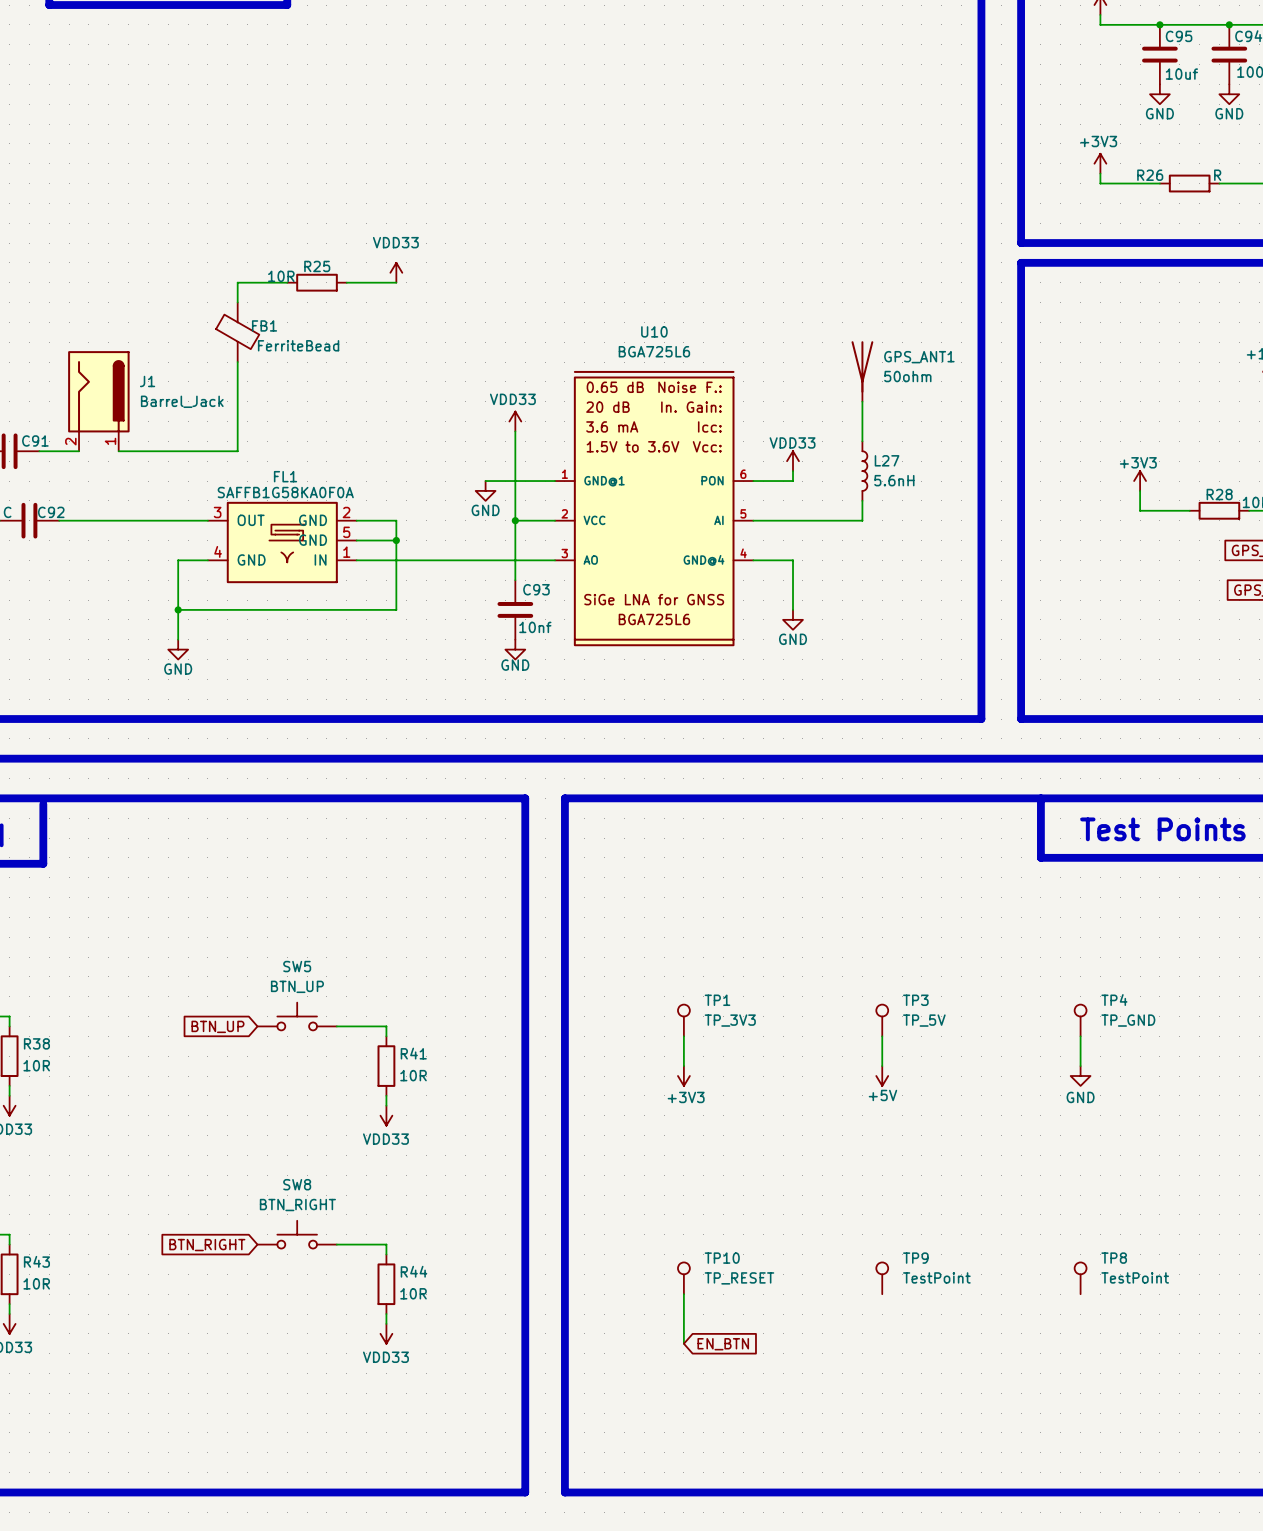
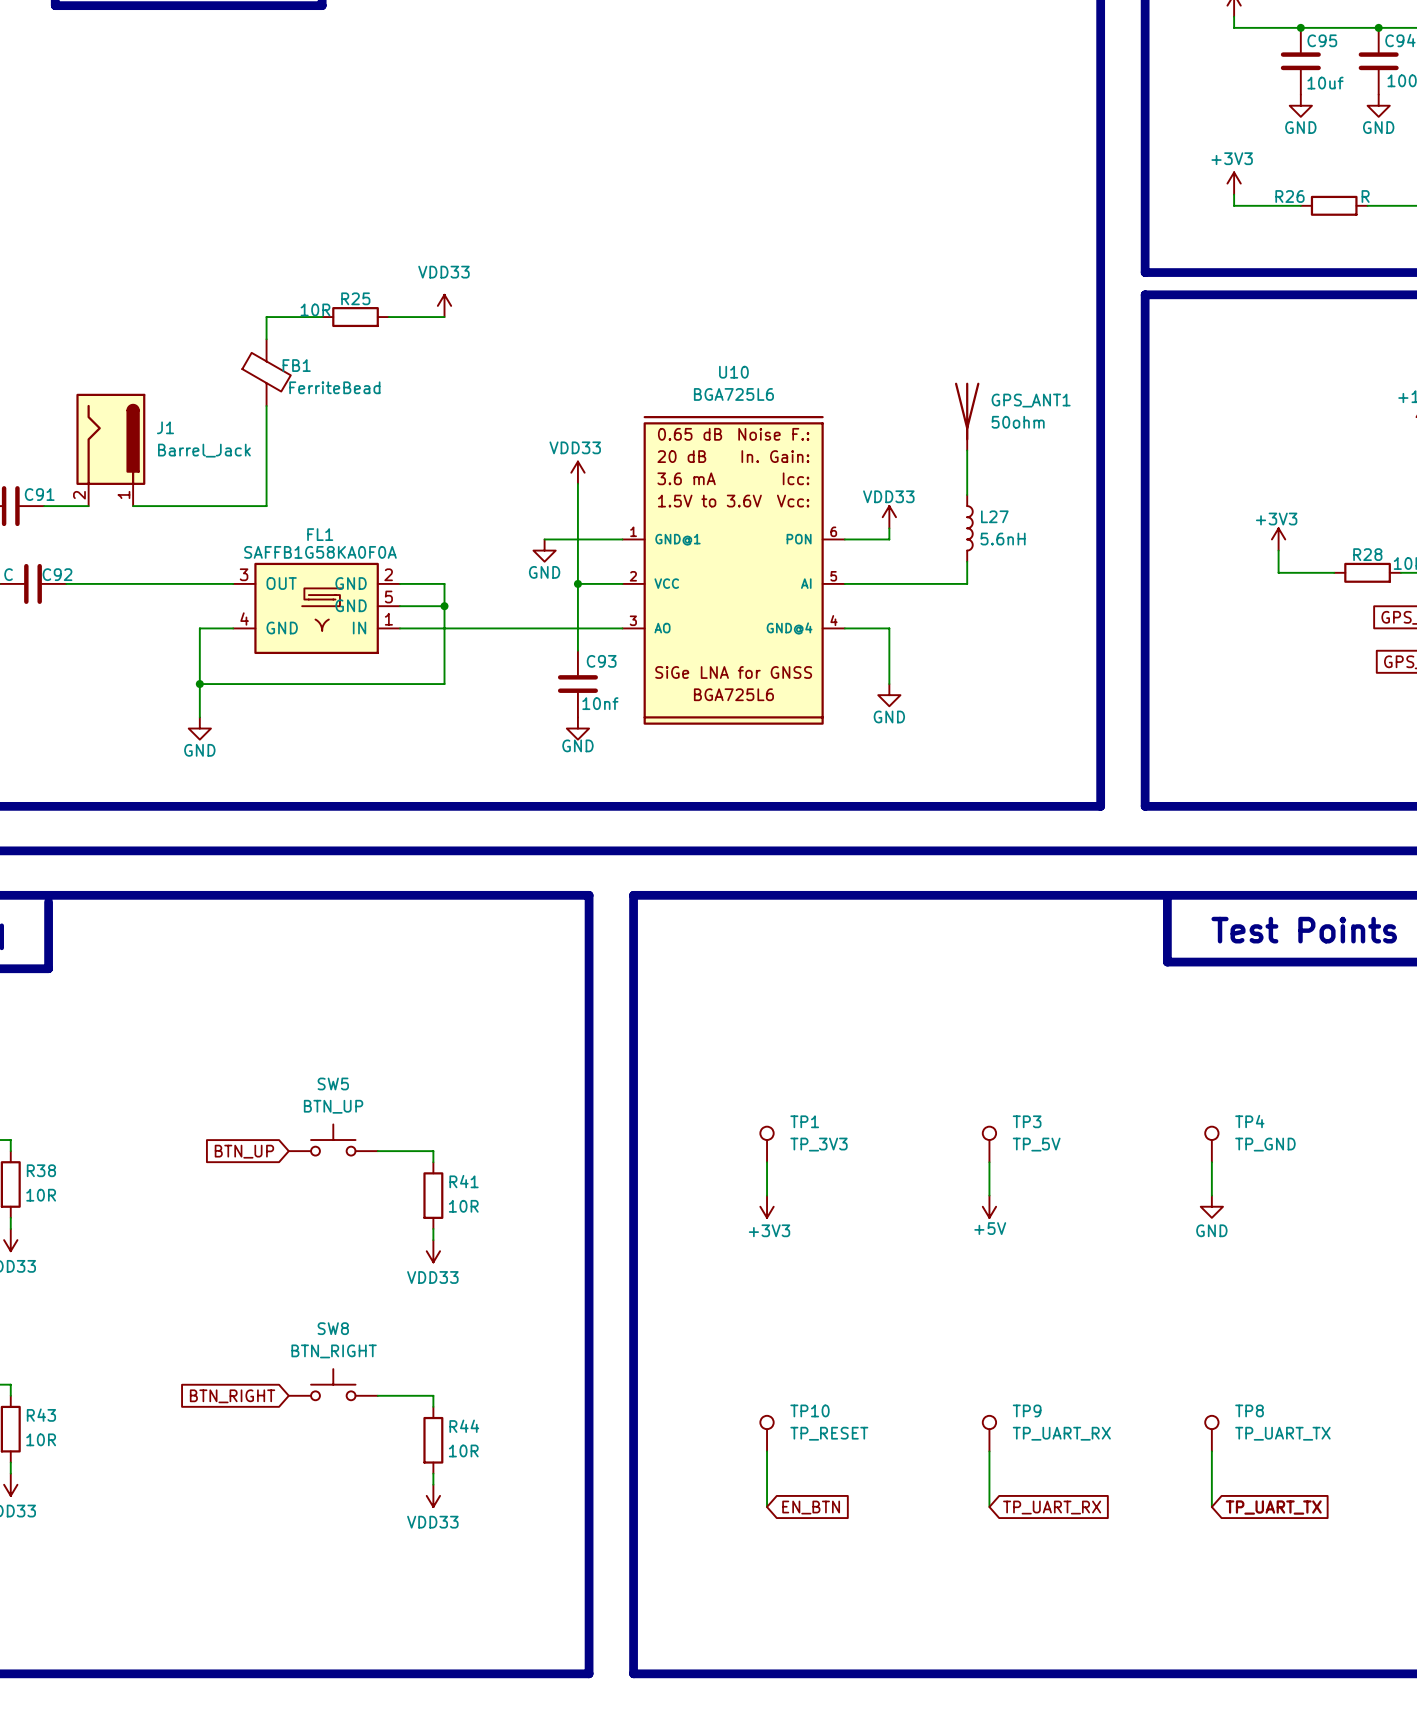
TP9 value: TestPoint (936, 1277) -> TP_UART_RX (1061, 1433)
TP8 value: TestPoint (1135, 1277) -> TP_UART_TX (1282, 1433)
wire: none -> (989, 1451) (989, 1507)
wire: none -> (1211, 1451) (1211, 1507)
global label: none -> TP_UART_RX (1052, 1507)
global label: none -> TP_UART_TX (1273, 1507)

